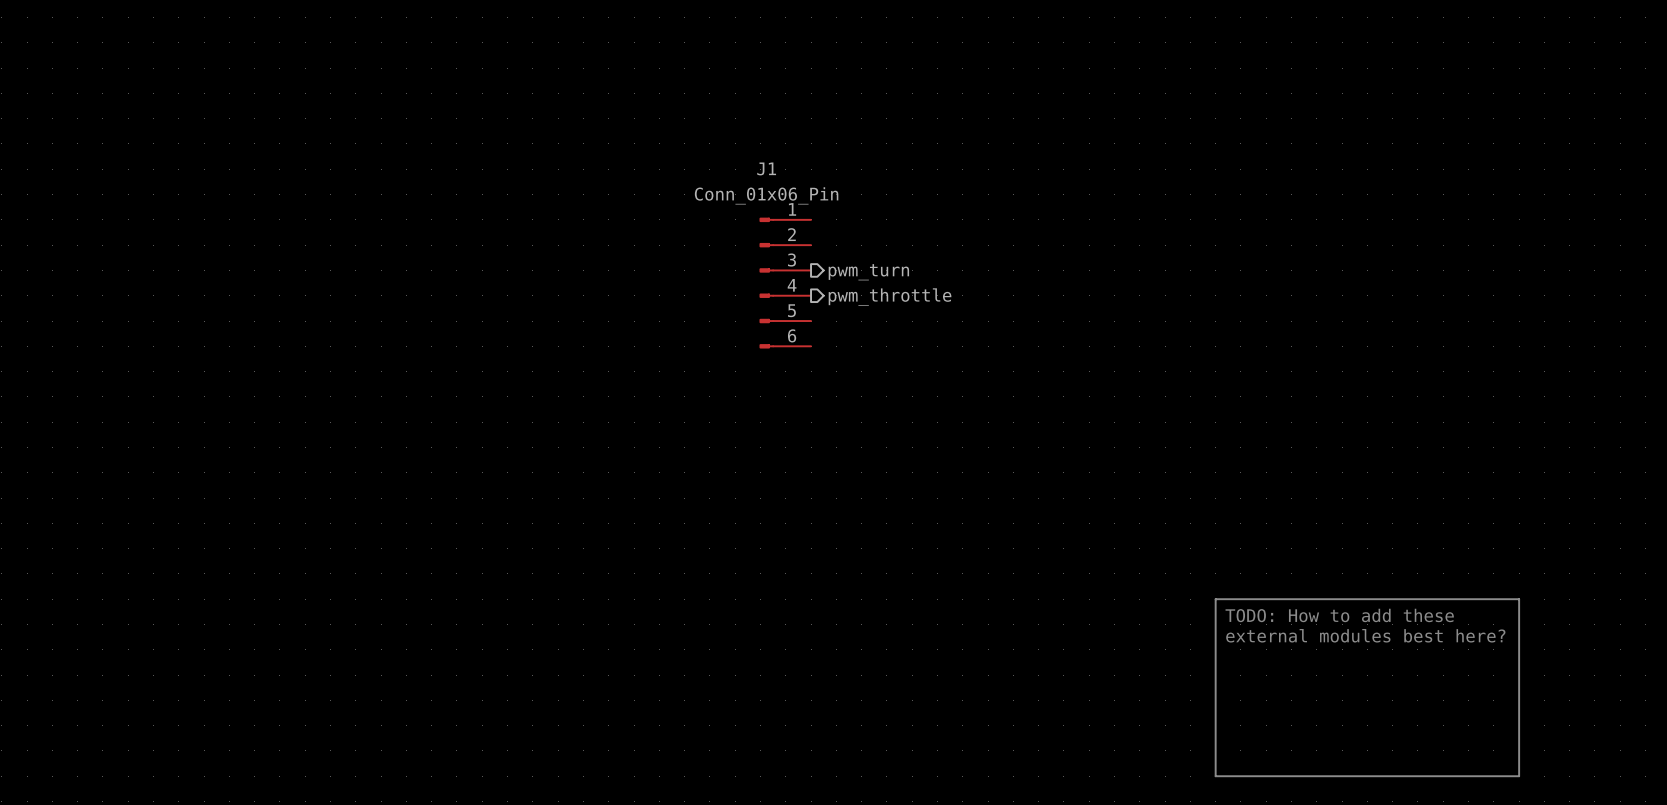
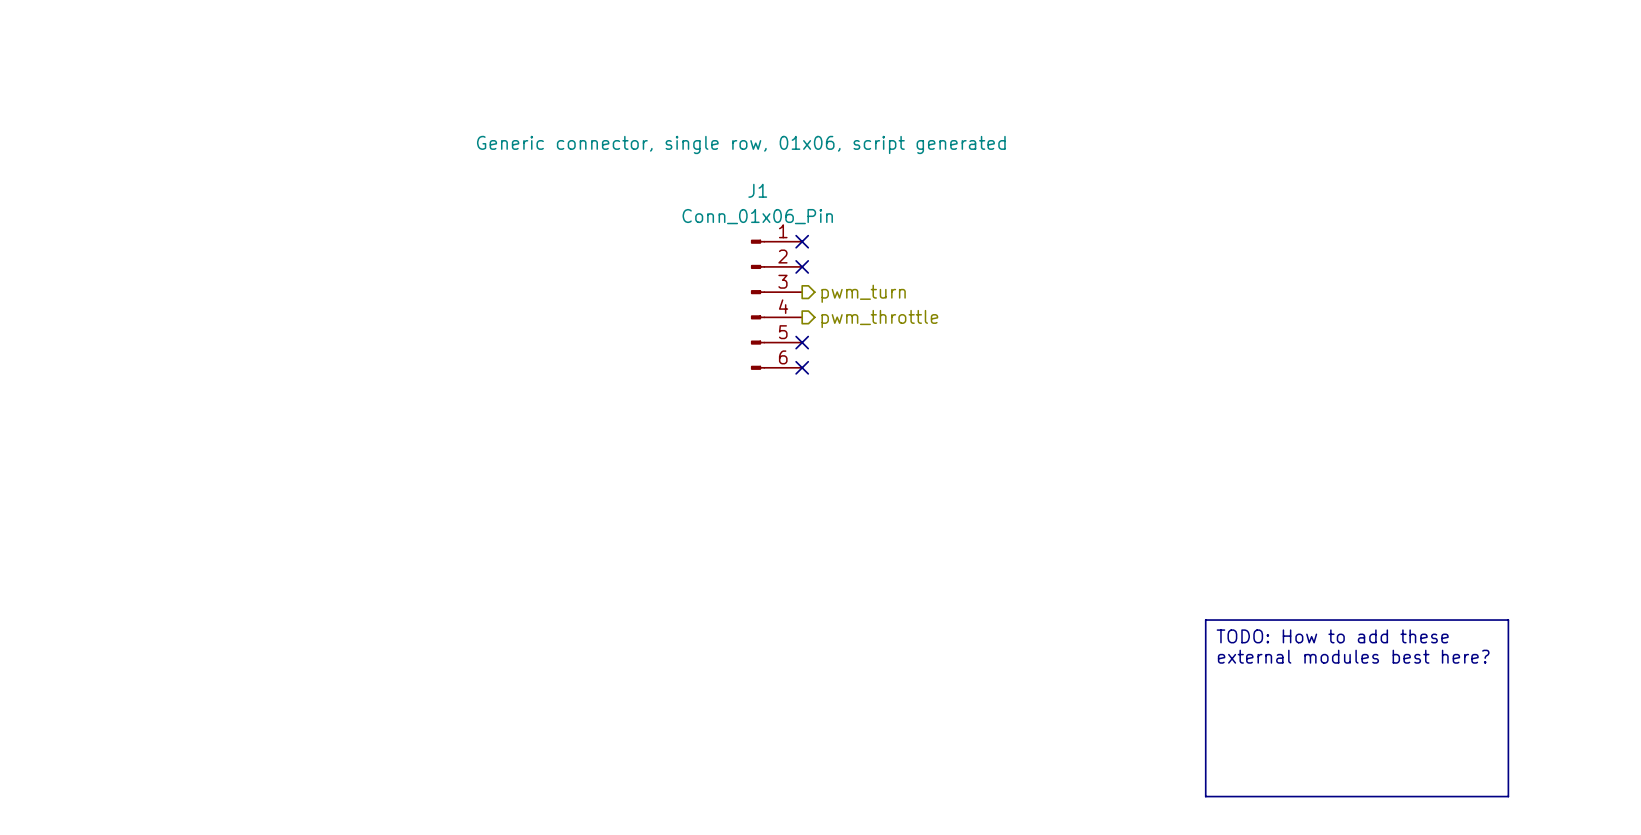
J1 text: none -> Generic connector, single row, 01x06, script generated (741, 144)
no-connect mark: none -> (802, 241)
no-connect mark: none -> (802, 266)
no-connect mark: none -> (802, 342)
no-connect mark: none -> (802, 367)

